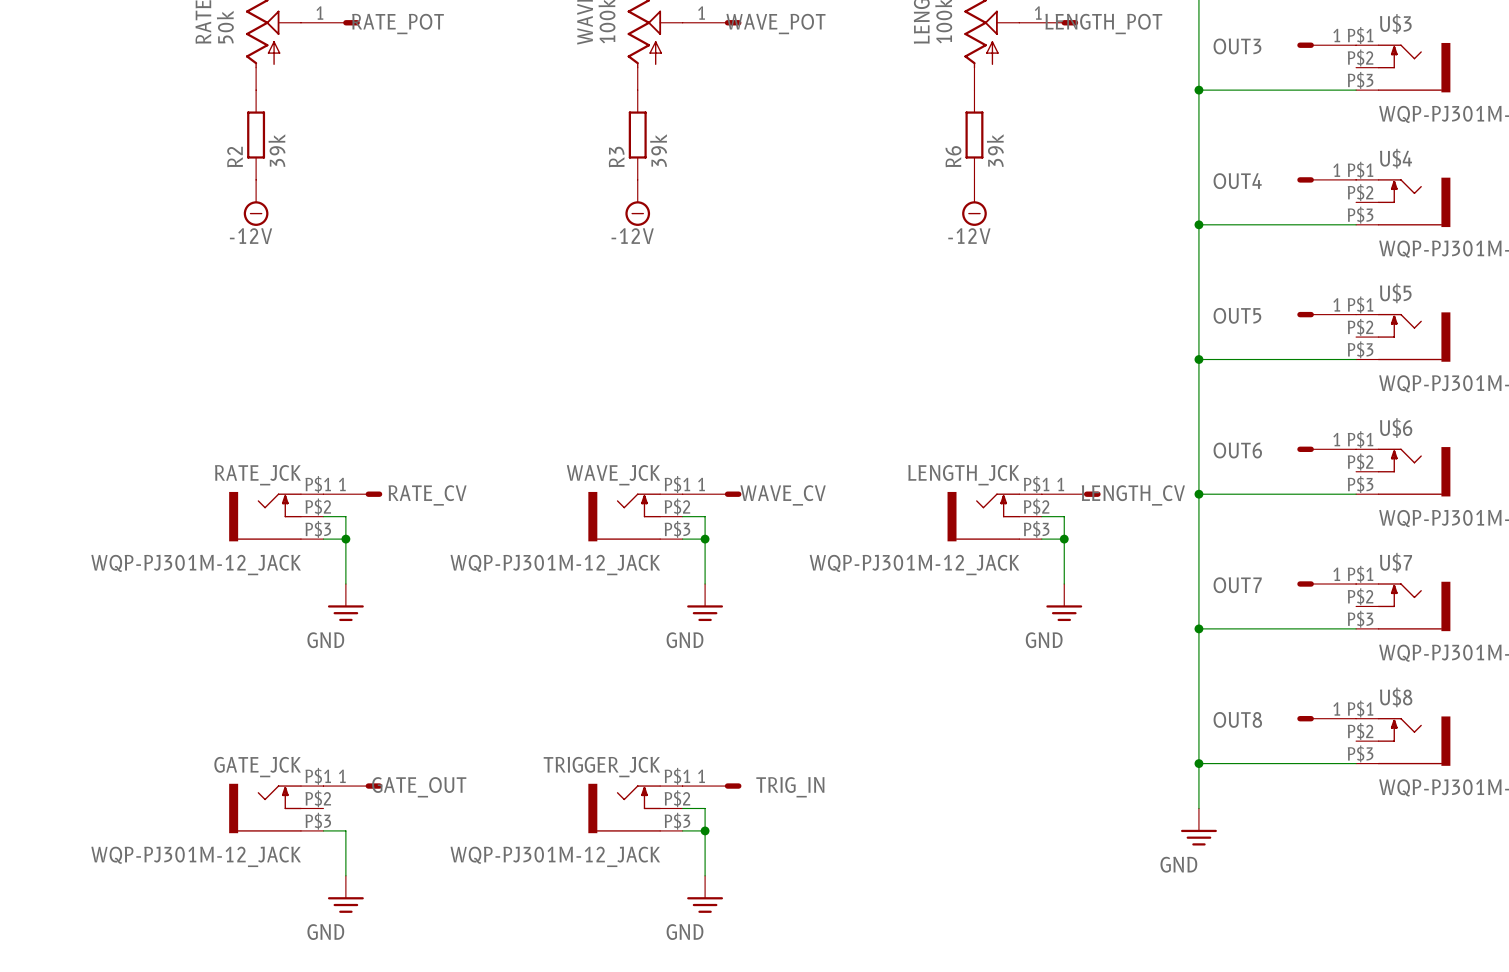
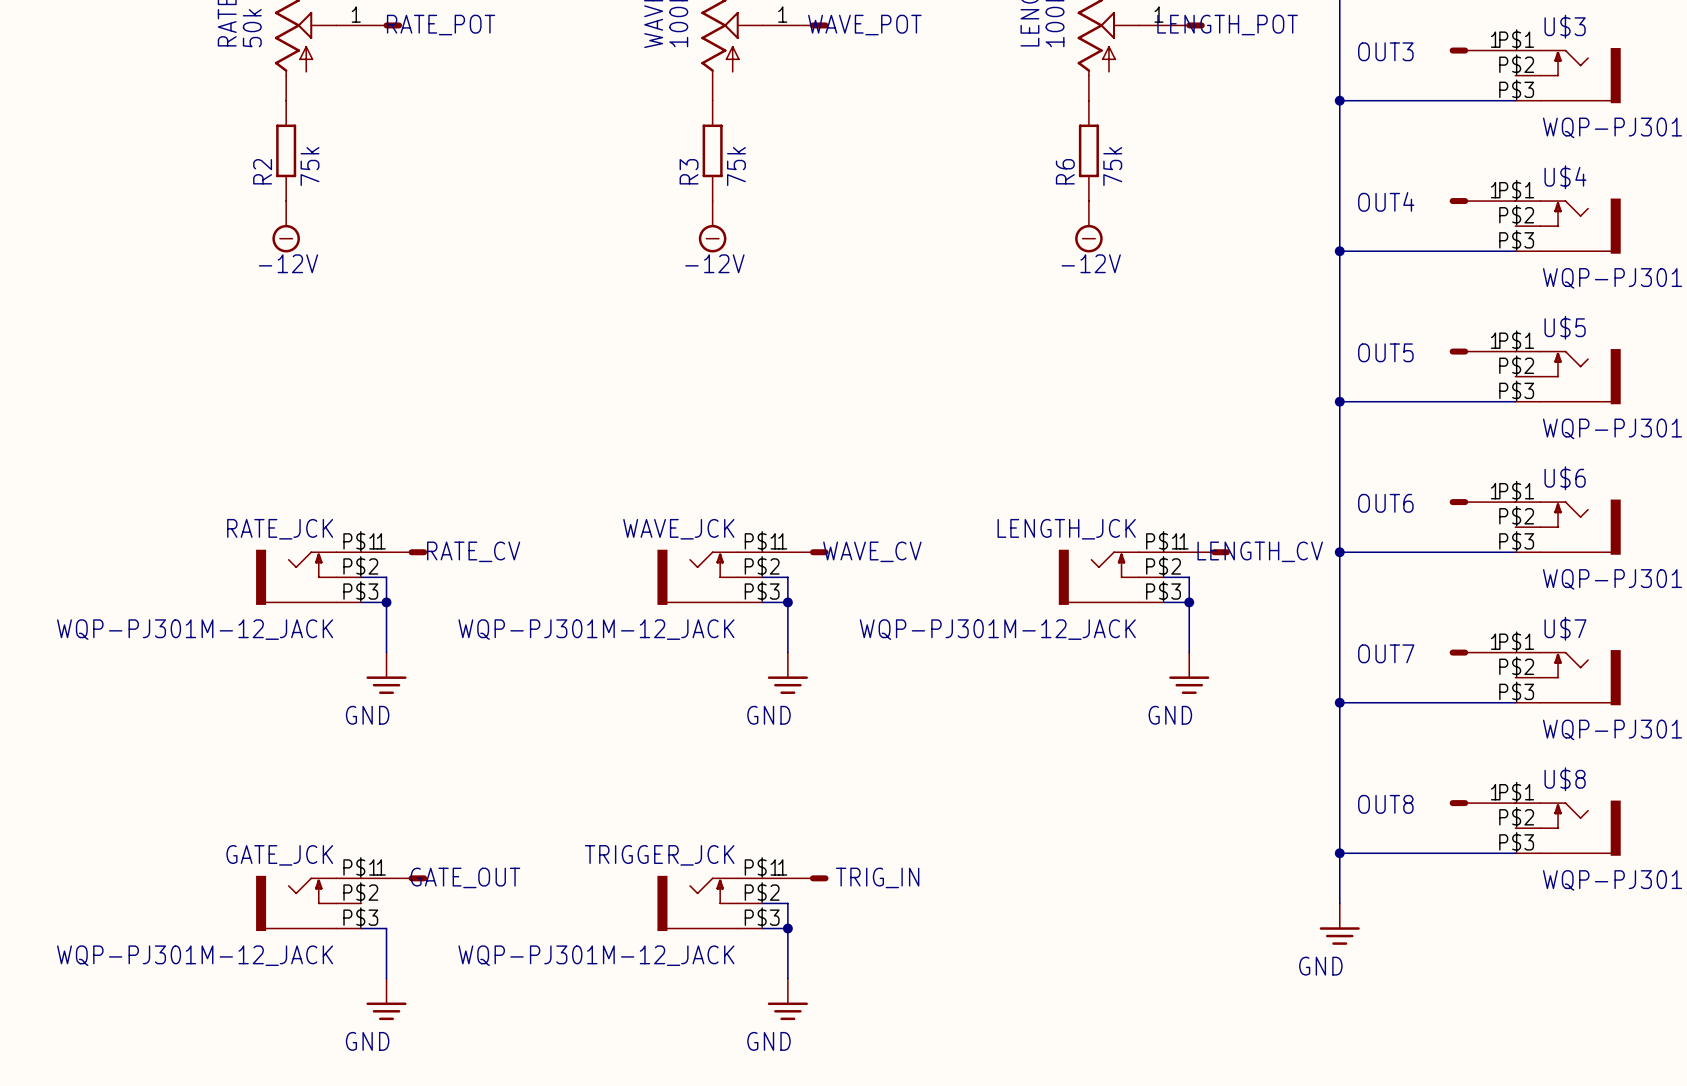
R2 value: 39k (276, 150) -> 75k (310, 166)
R3 value: 39k (658, 150) -> 75k (736, 166)
R6 value: 39k (995, 150) -> 75k (1112, 166)

